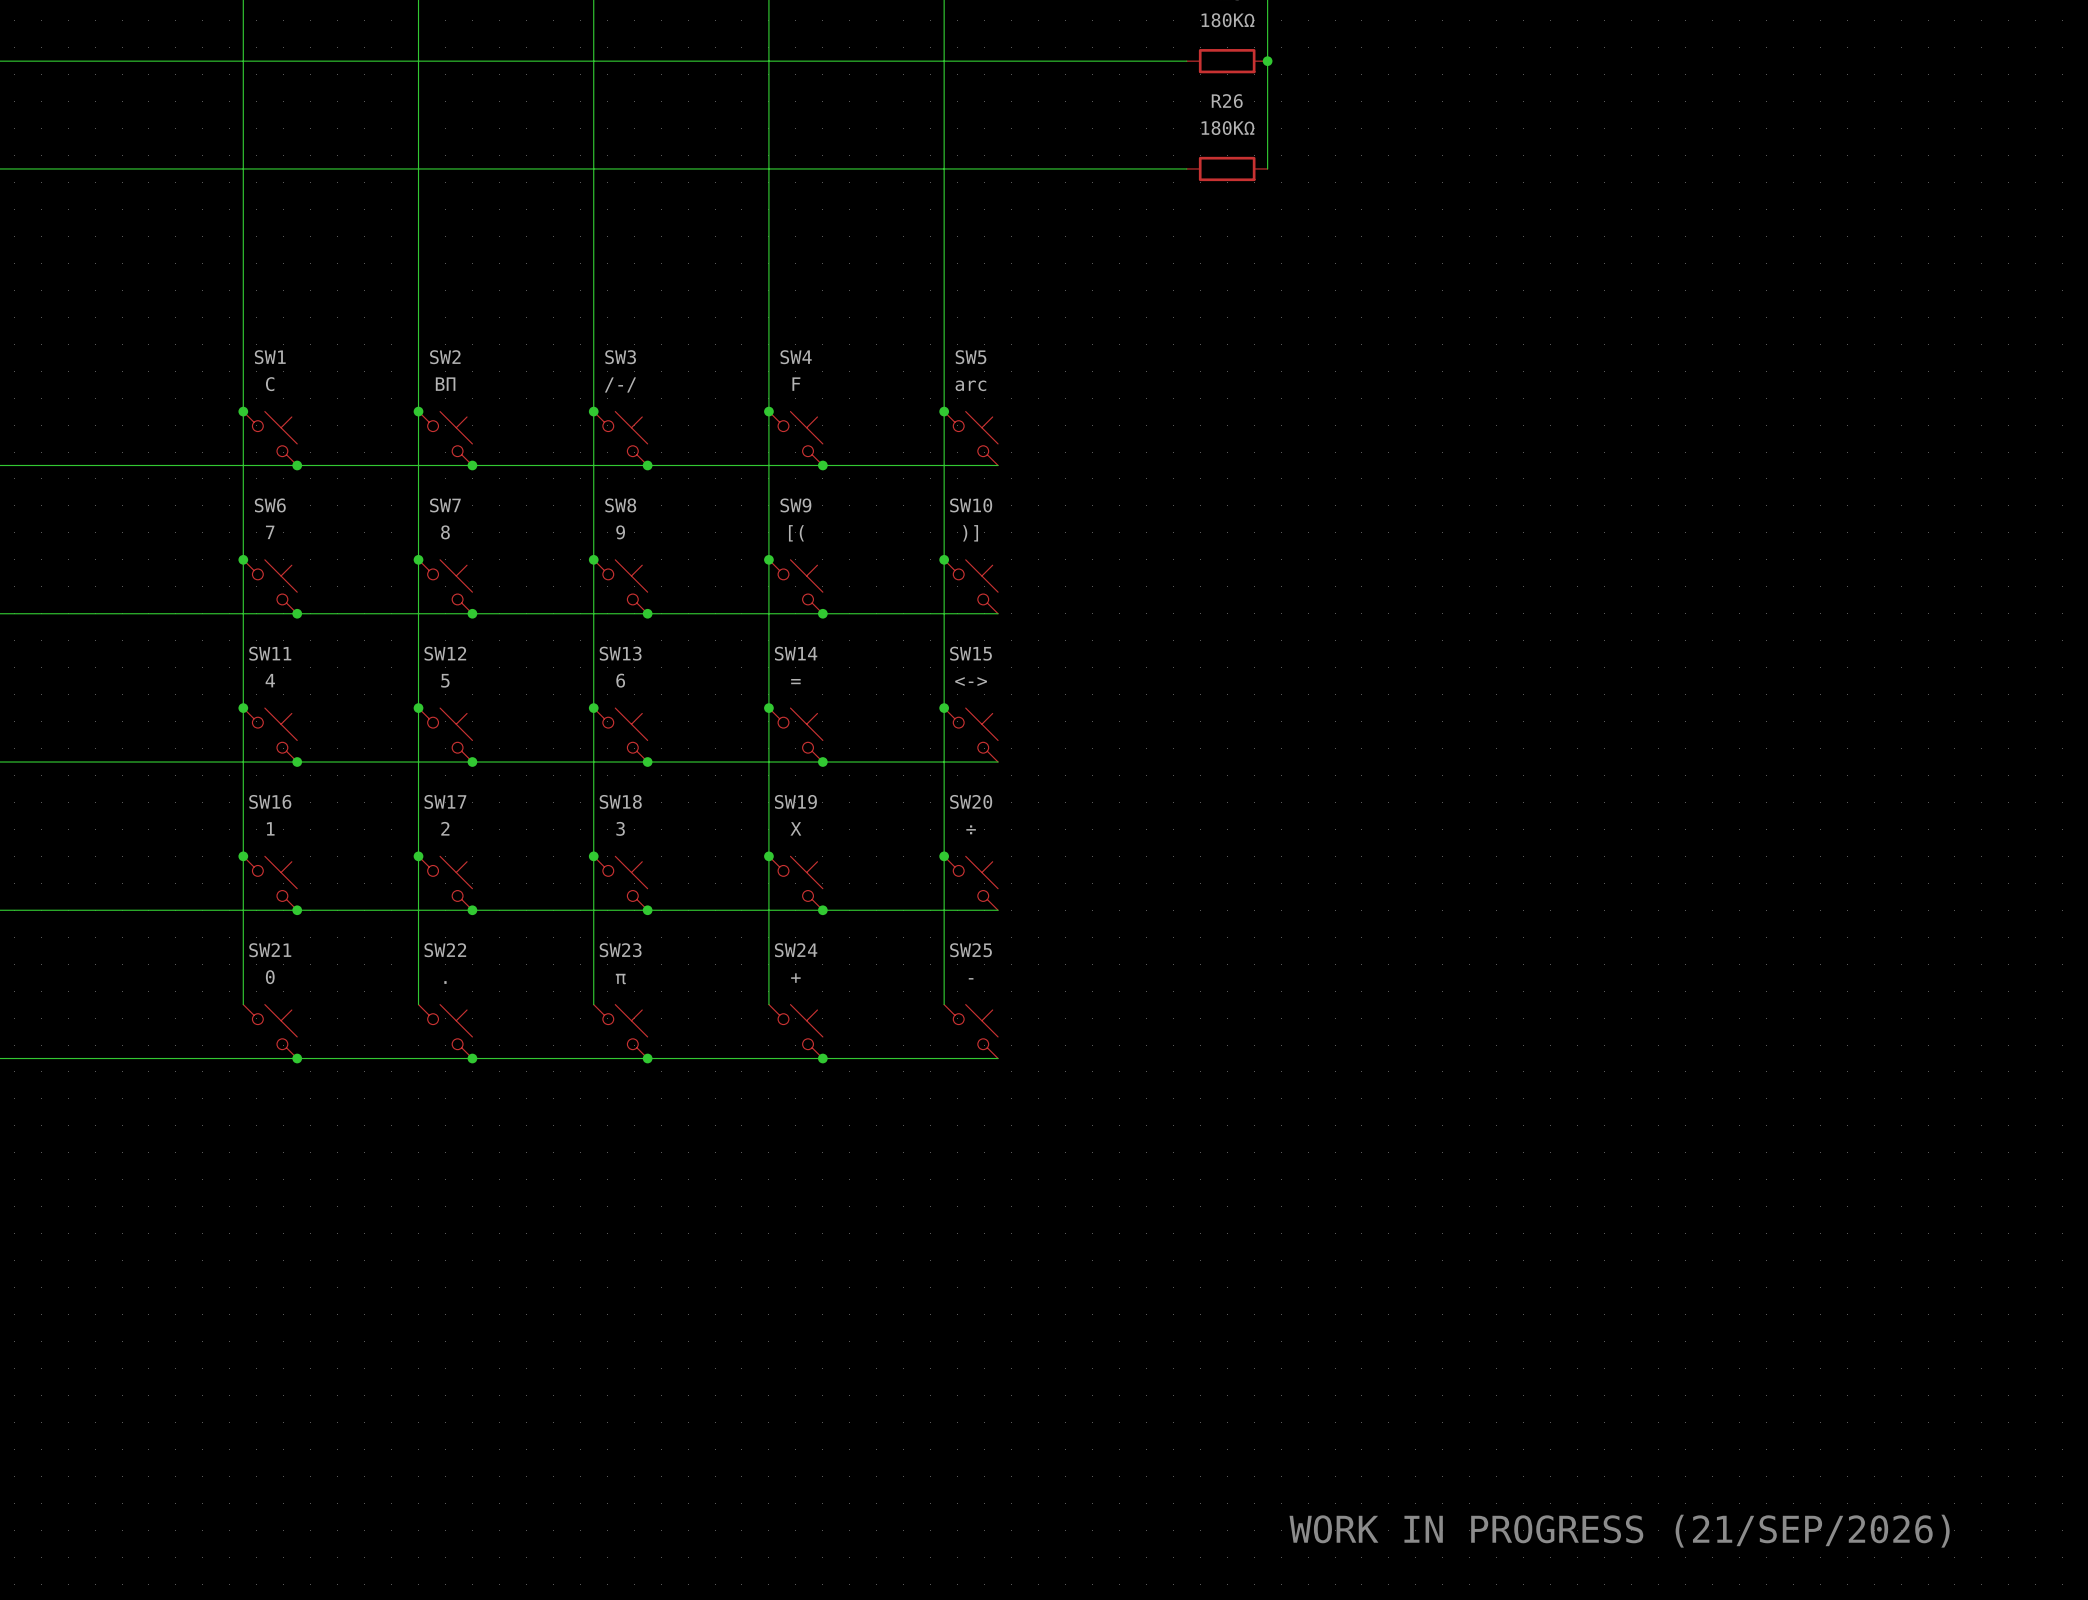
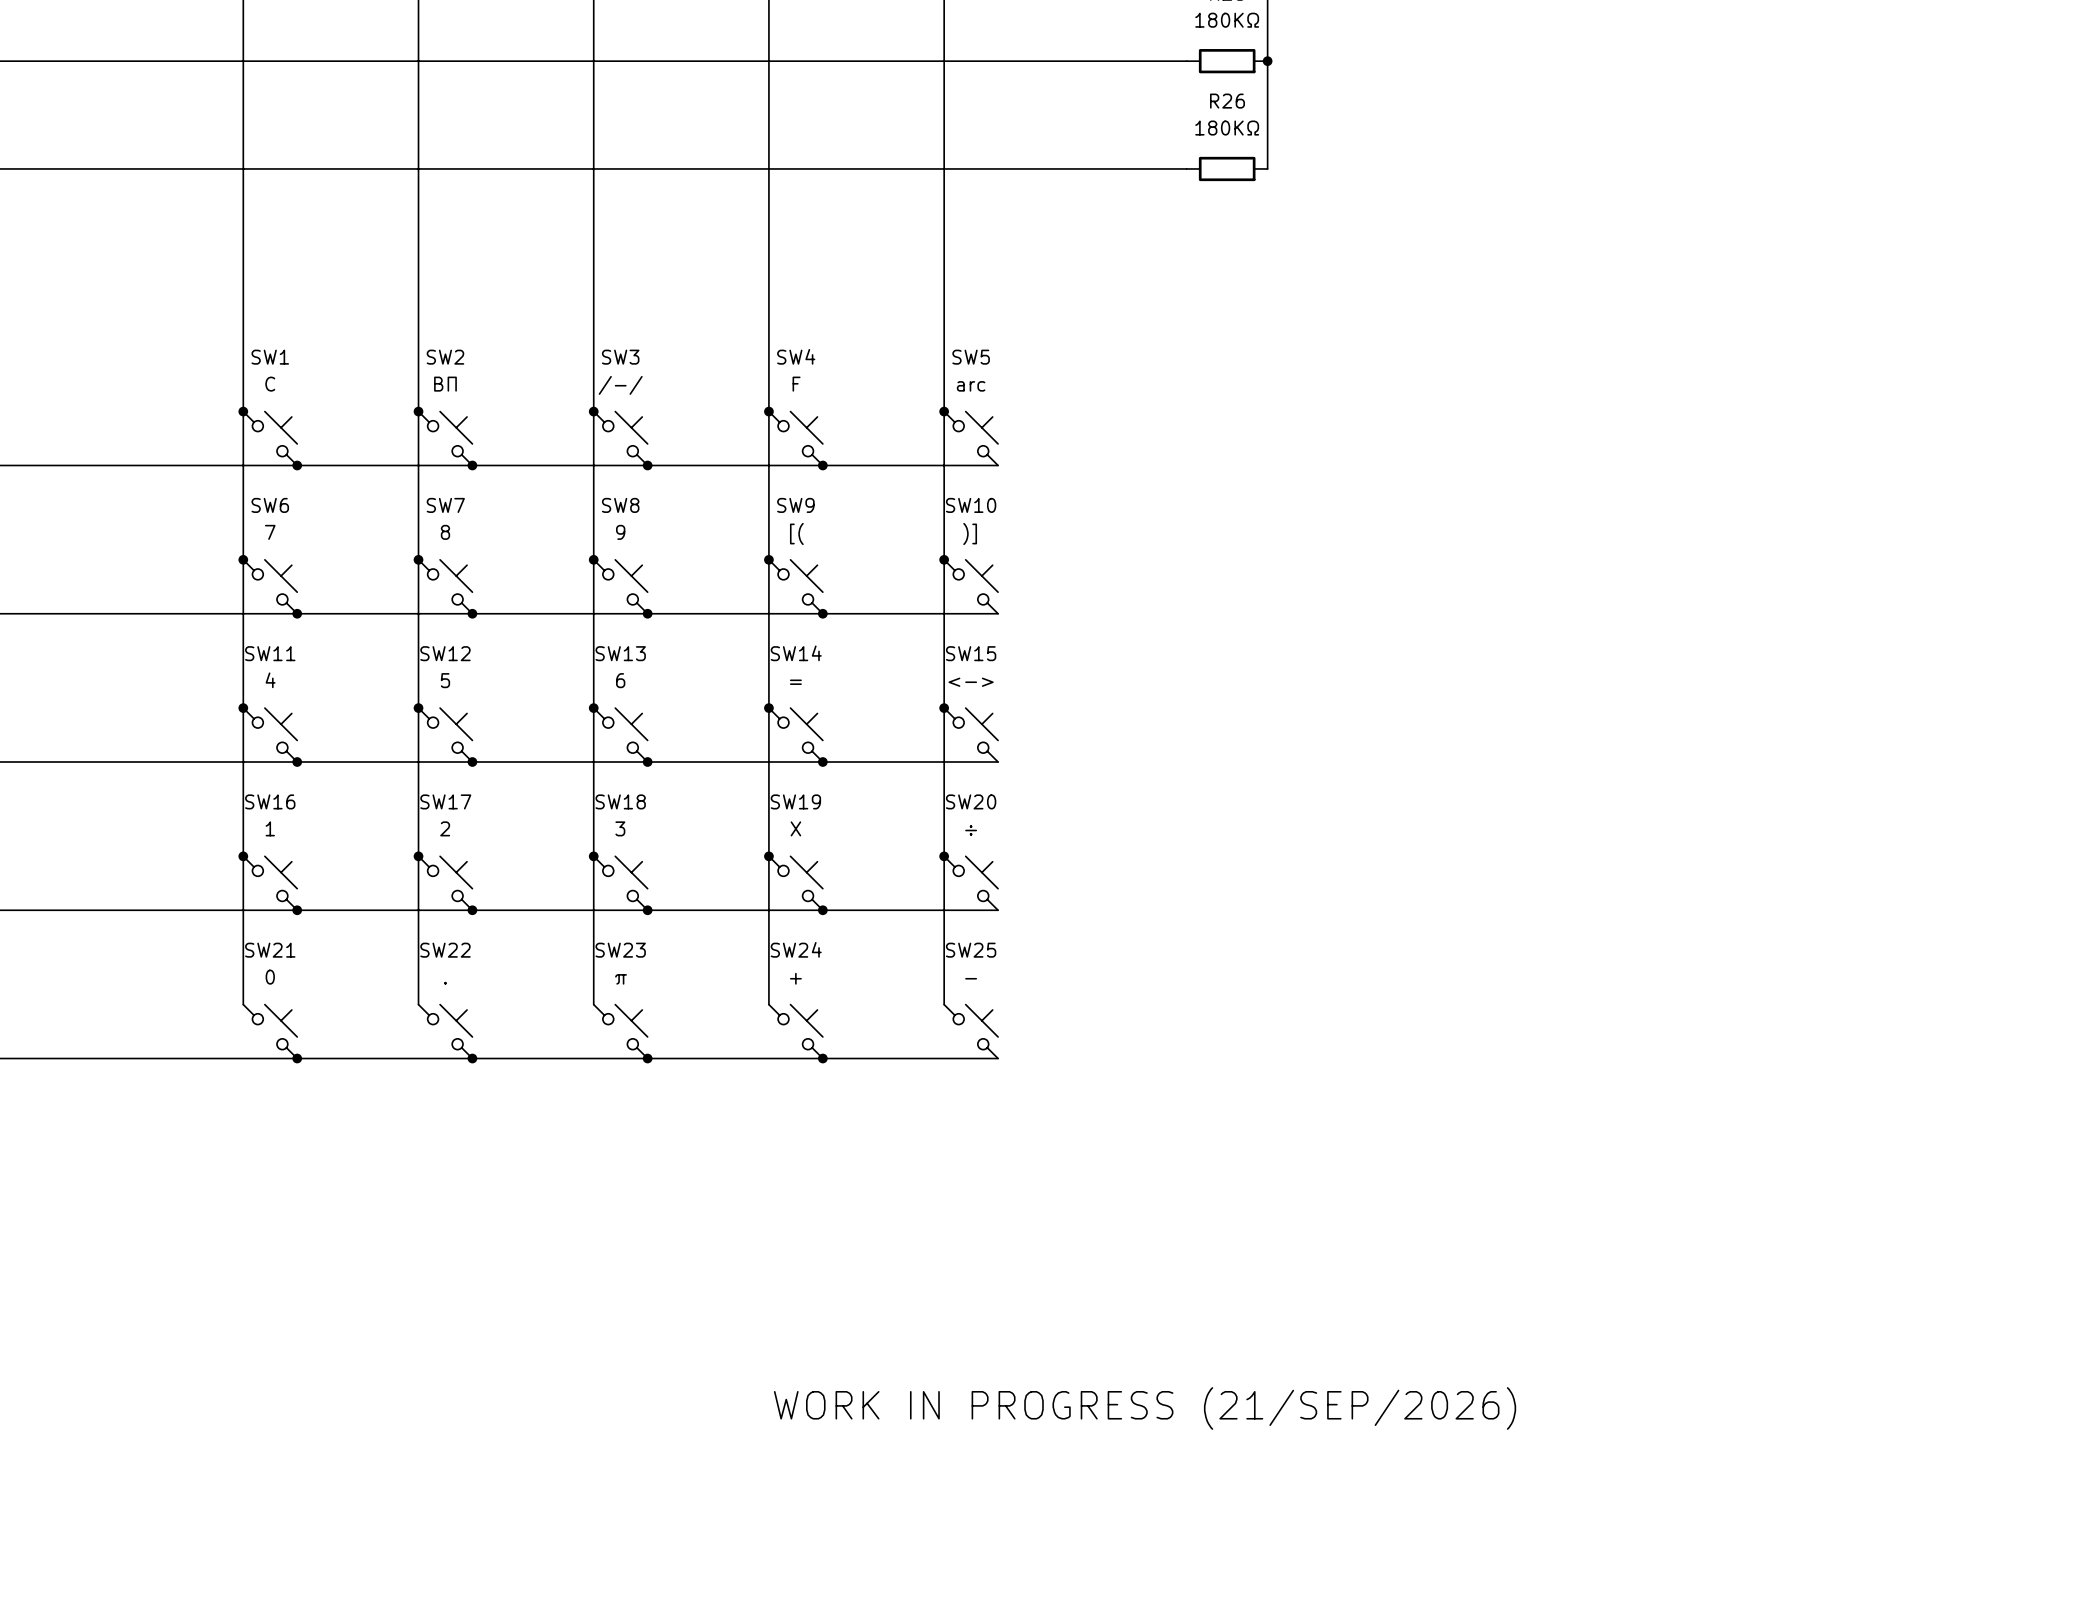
text: none -> WORK IN PROGRESS (21/SEP/2026) (1145, 1408)
text: WORK IN PROGRESS (21/SEP/2026) (1619, 1531) -> none

